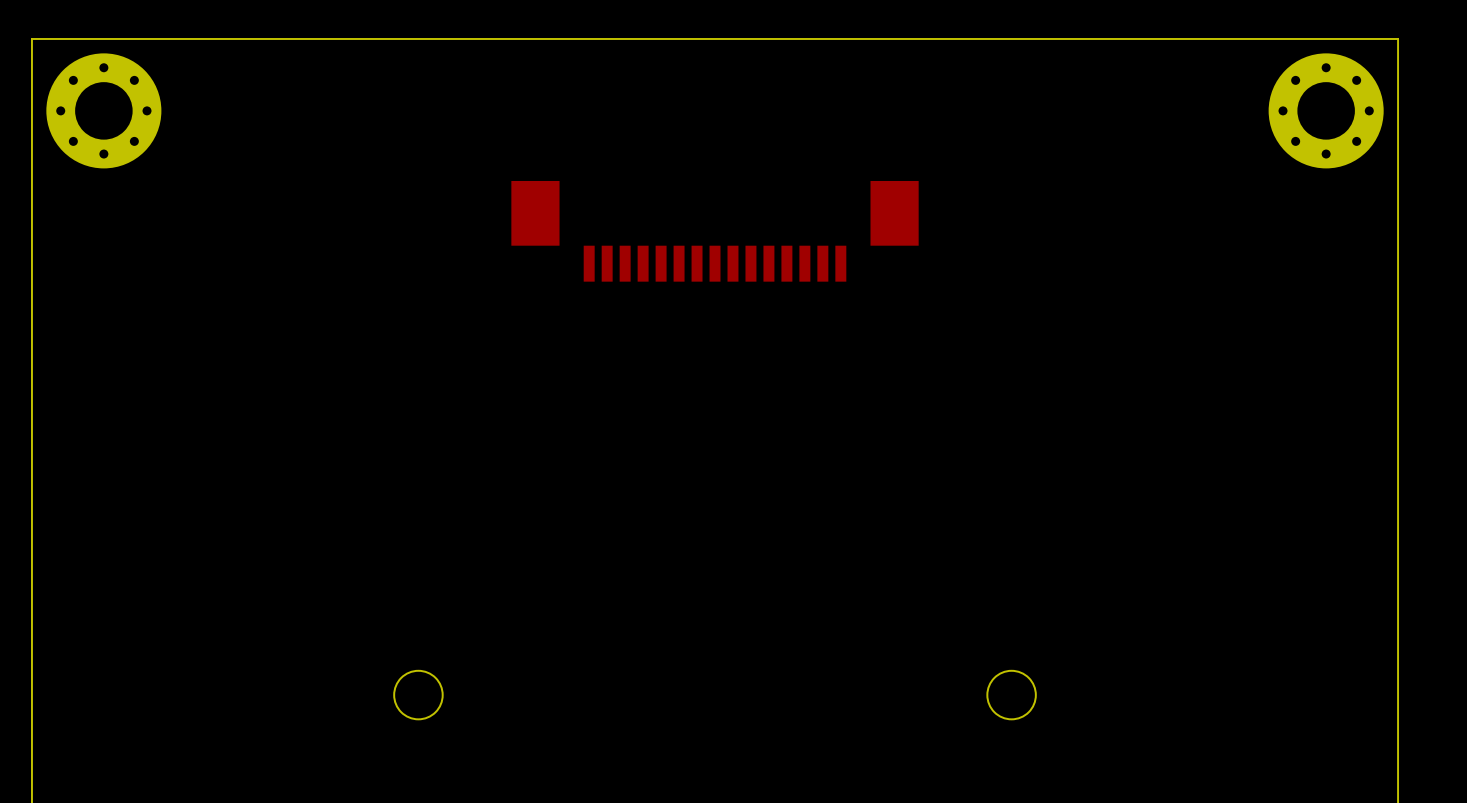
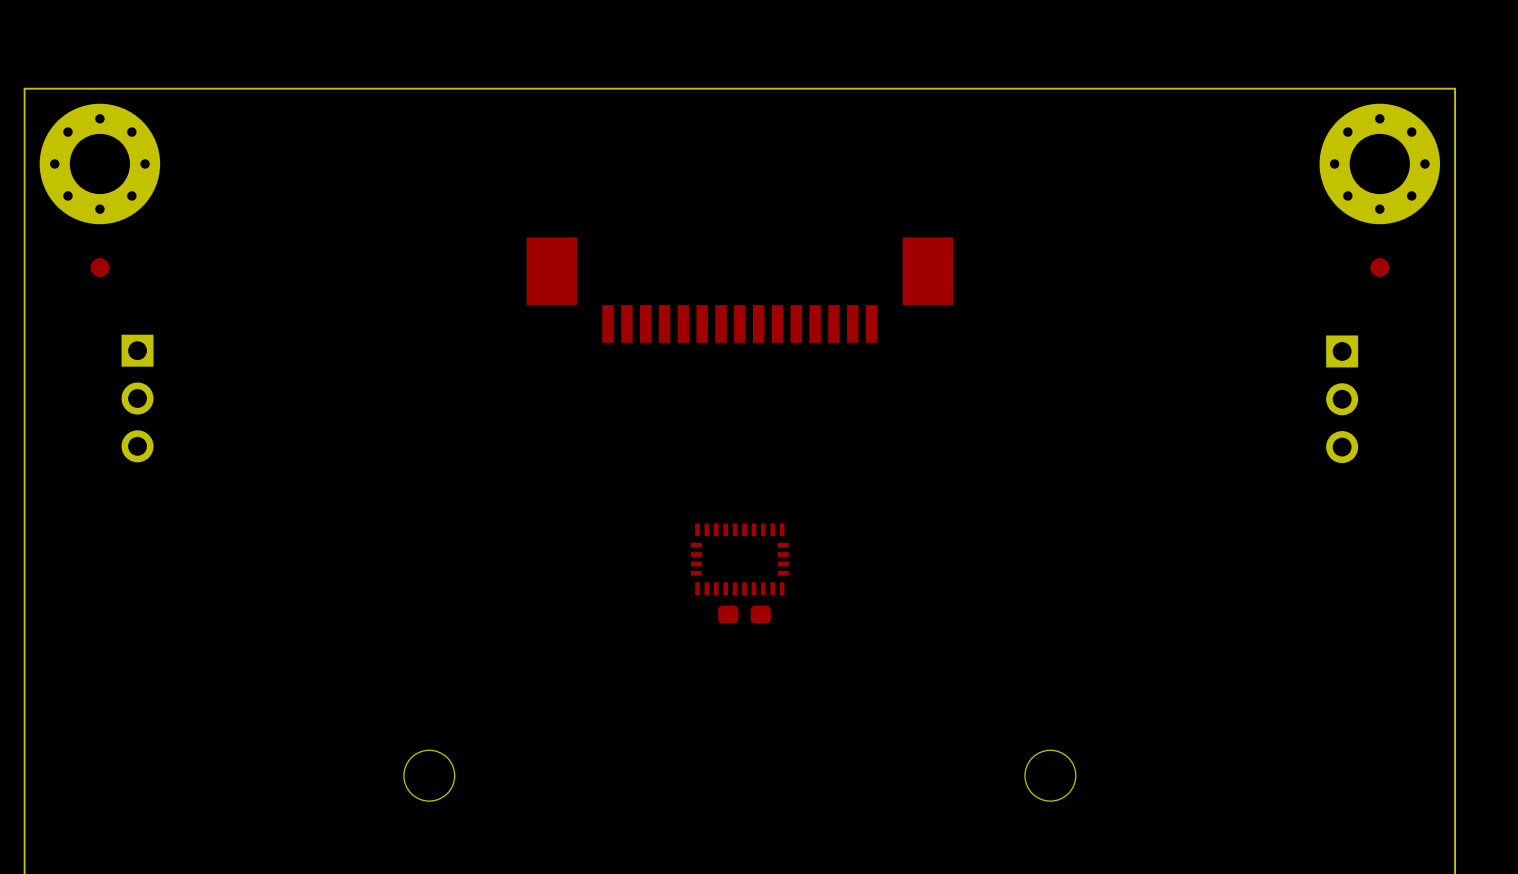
part: none -> (99, 267)
part: none -> (1379, 267)
part: none -> (137, 398)
part: none -> (1342, 399)
part: none -> (739, 559)
part: none -> (744, 614)

